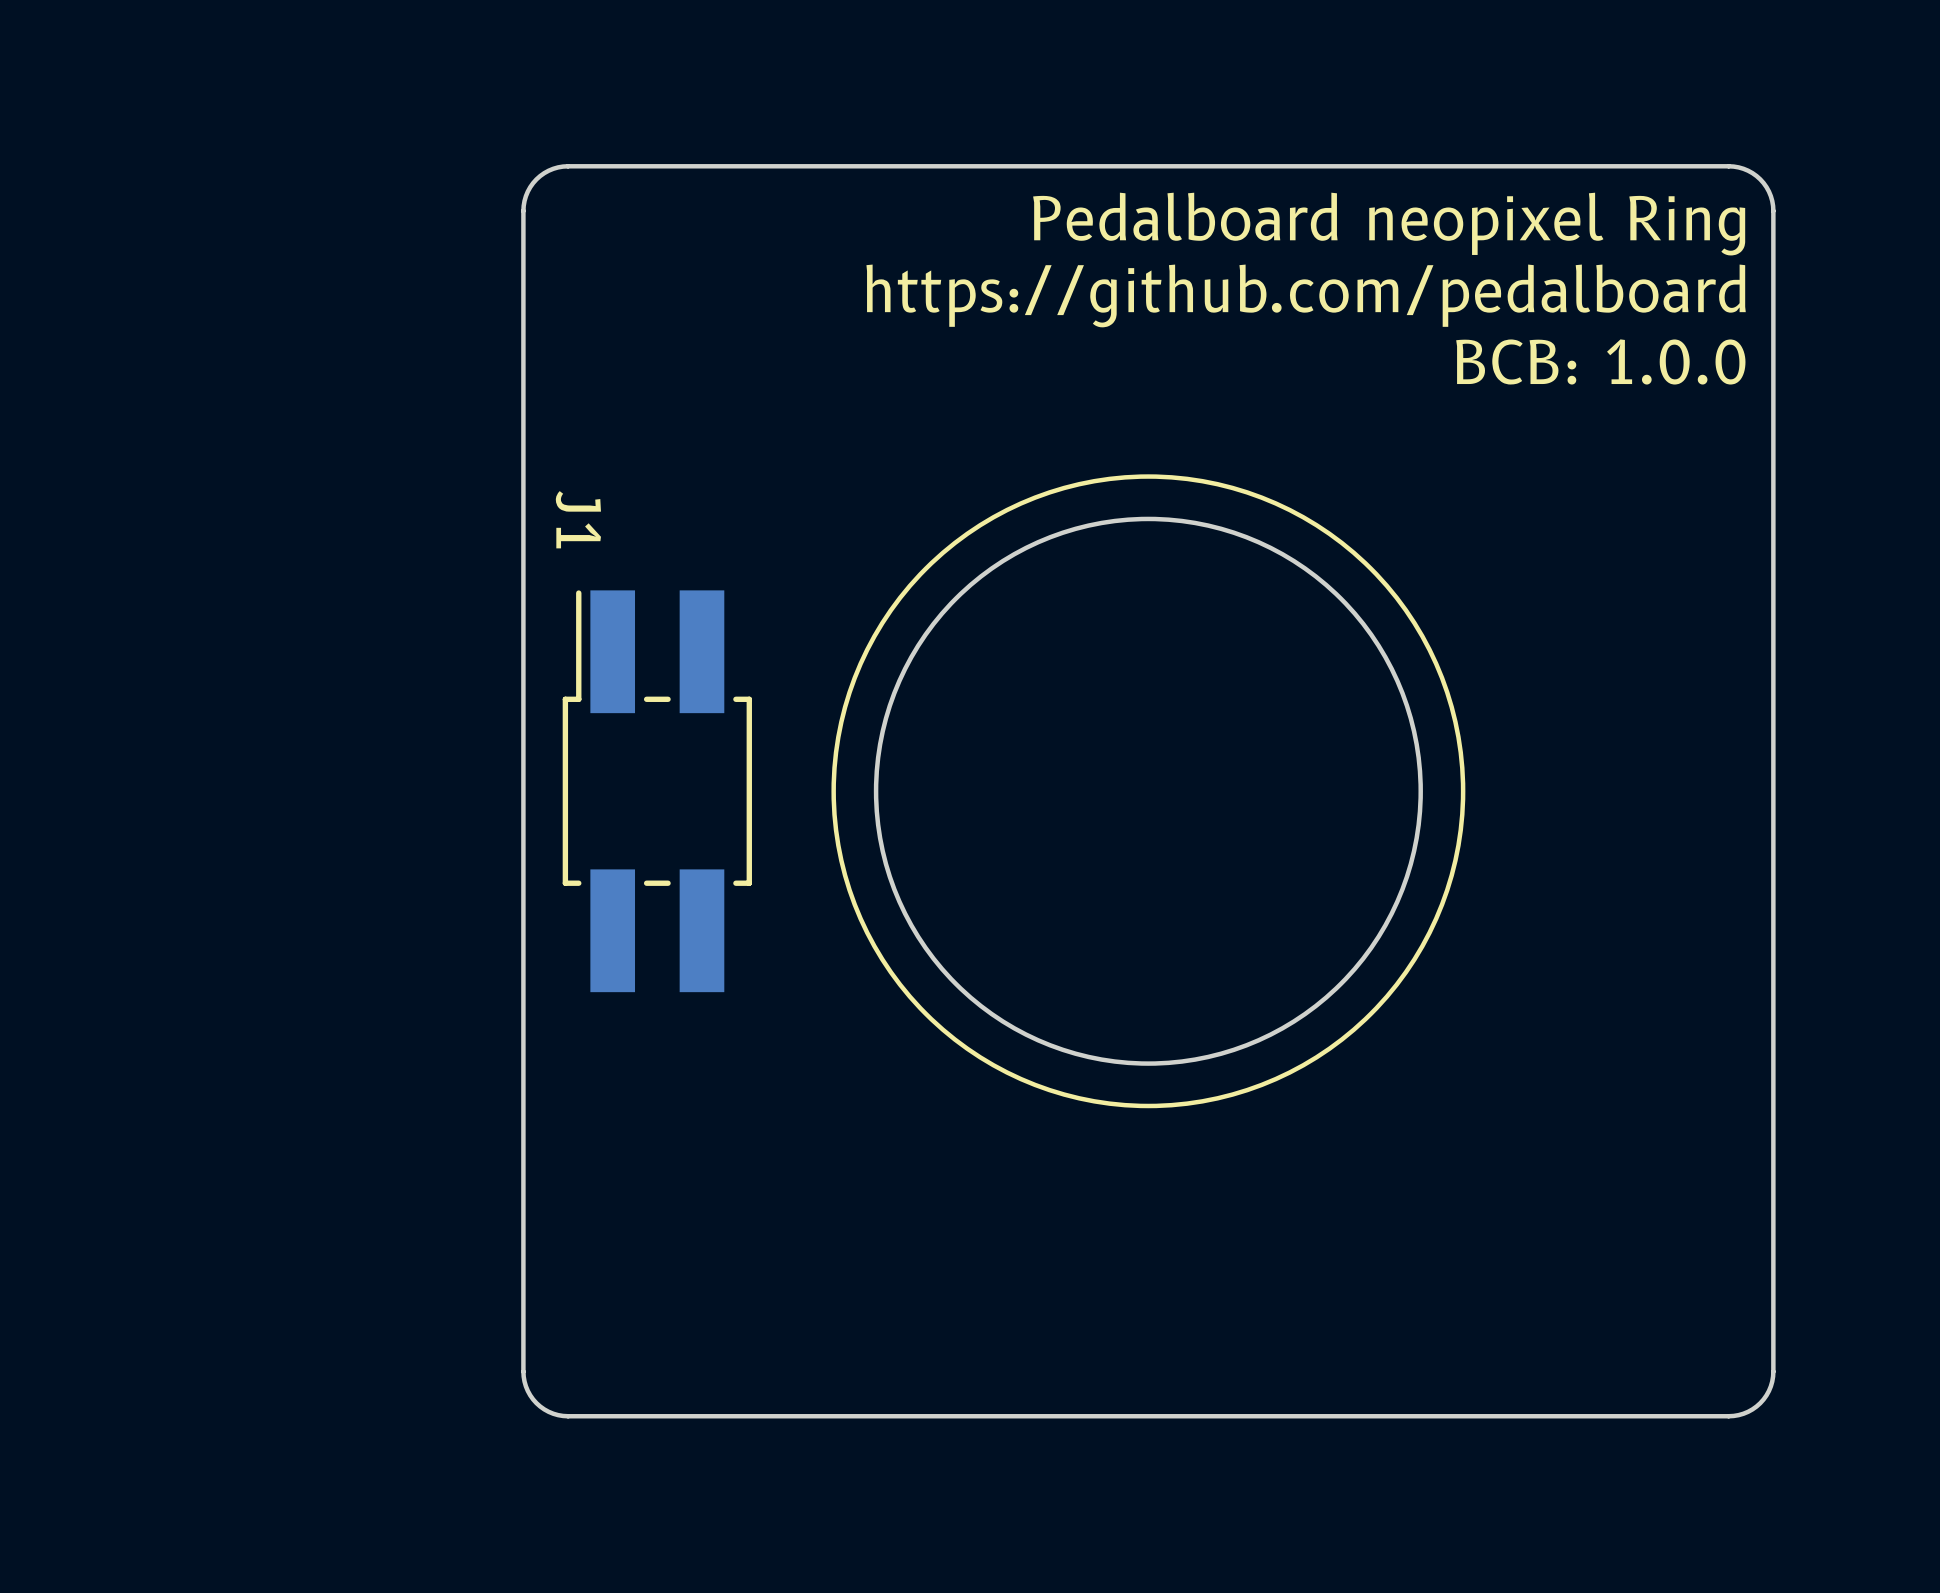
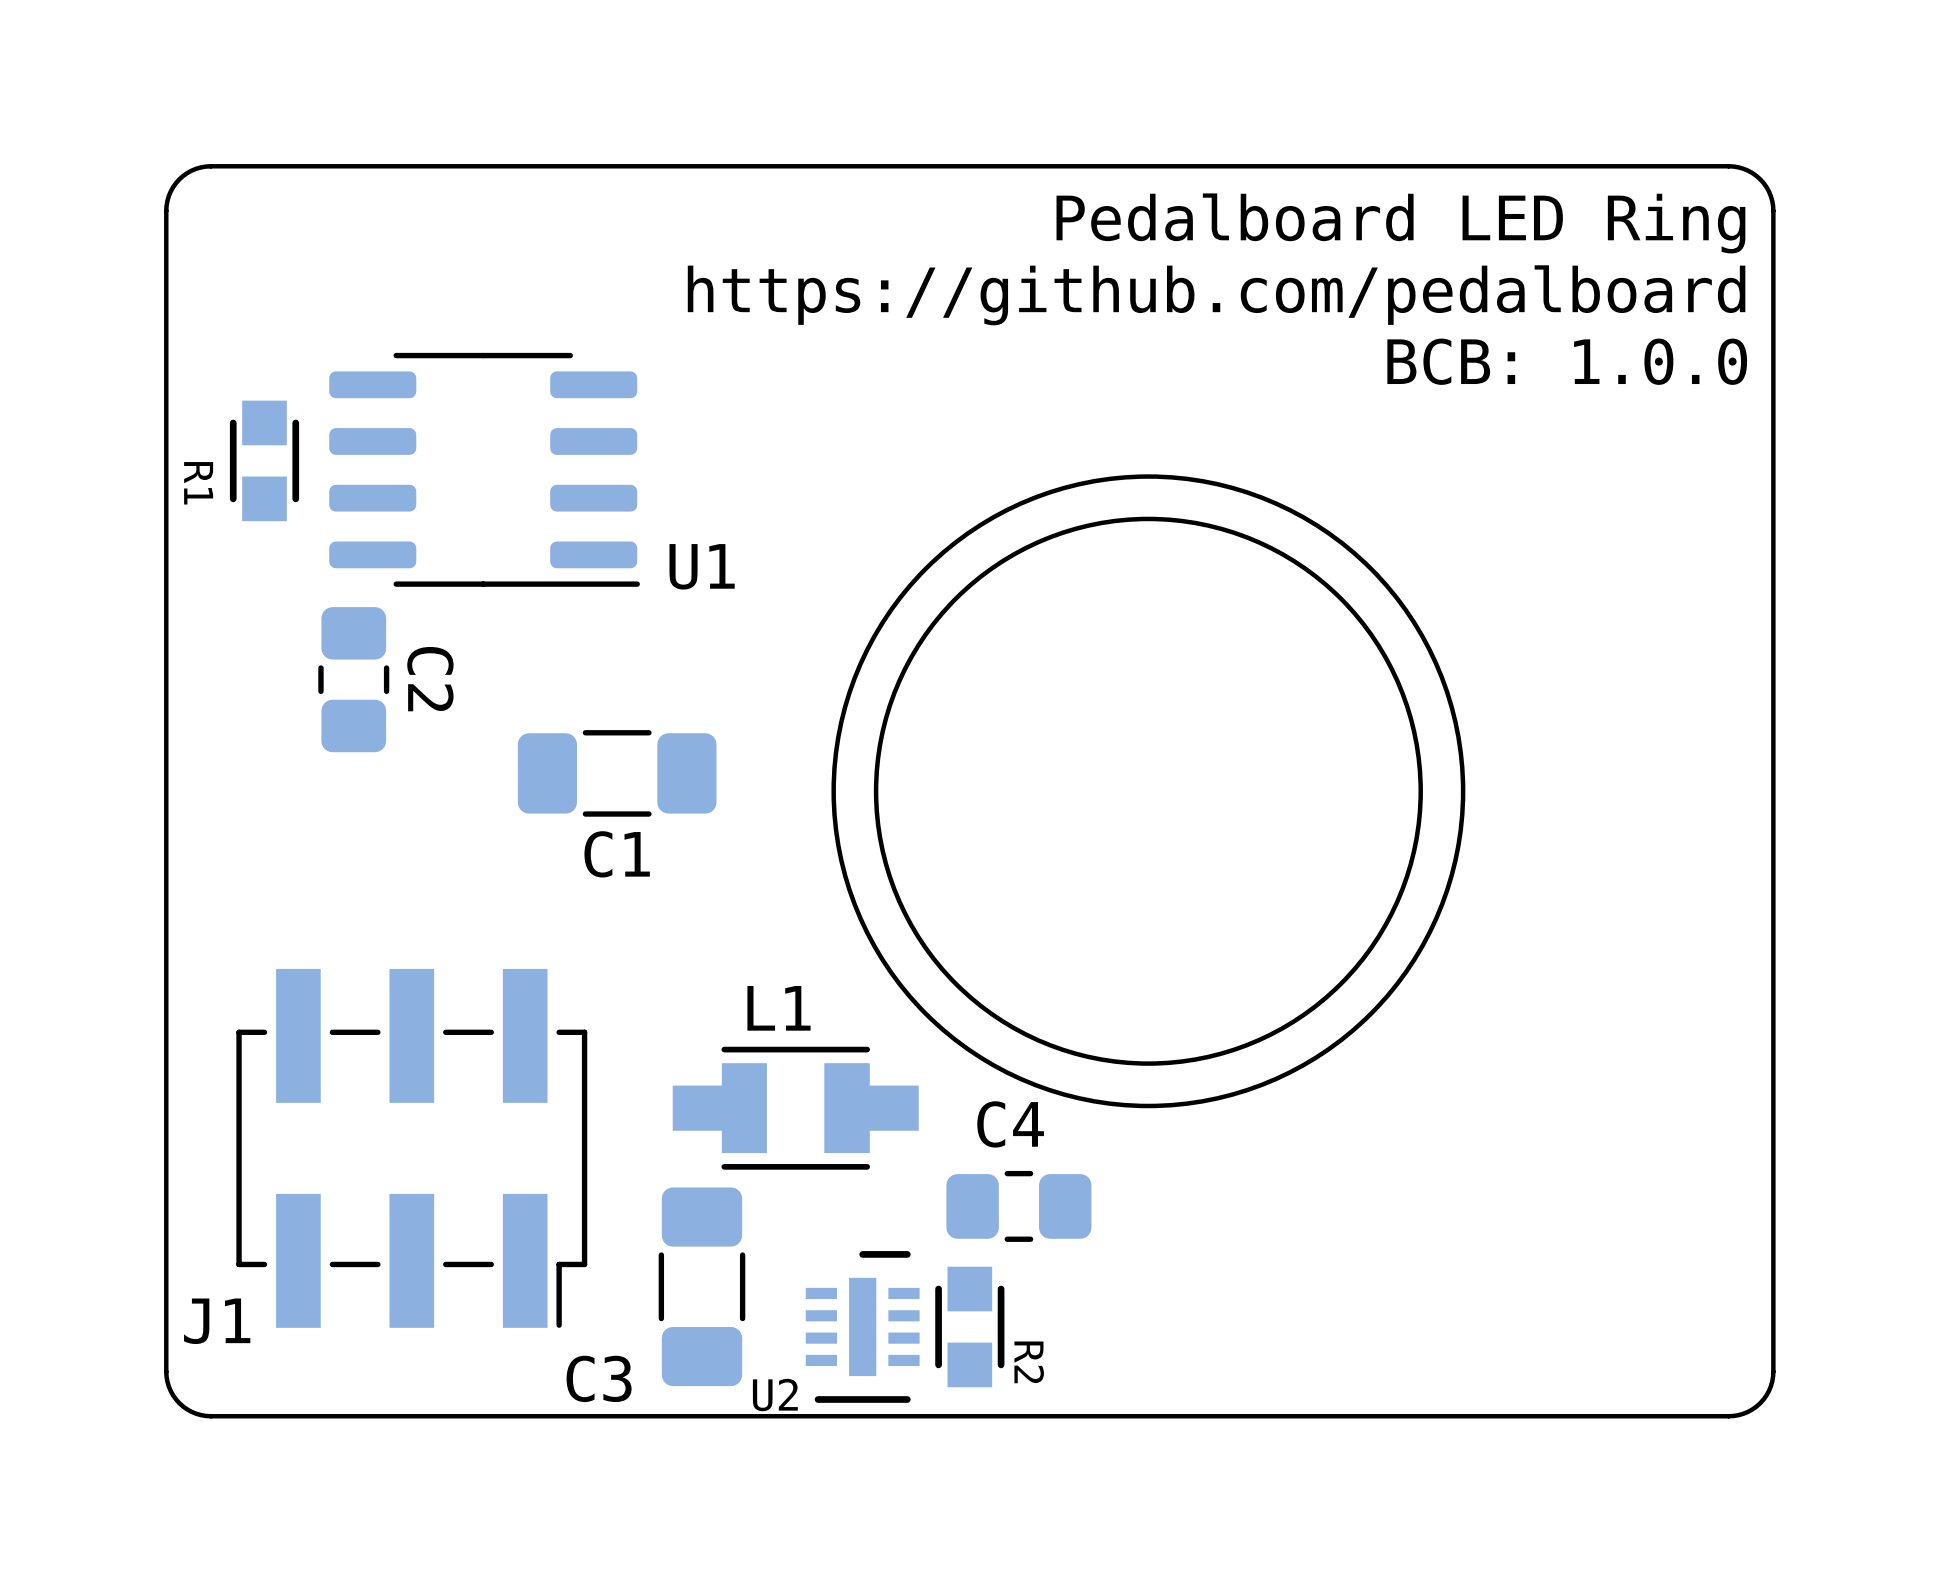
board edge: (568, 166) (548, 170) (536, 179) (525, 196) (523, 210) (523, 1371) (525, 1386) (536, 1403) (553, 1413) (568, 1416) -> (568, 166) (205, 166) (187, 173) (176, 183) (168, 196) (166, 210) (166, 1371) (168, 1386) (176, 1399) (183, 1406) (191, 1411) (205, 1415) (568, 1416)
text: Pedalboard neopixel Ring (1389, 224) -> Pedalboard LED Ring (1400, 223)
R1: none -> (264, 460)
U1: none -> (484, 469)
J1 name position: J1 (578, 519) -> J1 (217, 1321)
J1 footprint: [562, 590, 752, 993] -> [236, 968, 588, 1328]
C2: none -> (353, 679)
C1: none -> (617, 773)
L1: none -> (795, 1108)
C4: none -> (1018, 1206)
C3: none -> (701, 1286)
U2: none -> (862, 1326)
R2: none -> (969, 1326)

